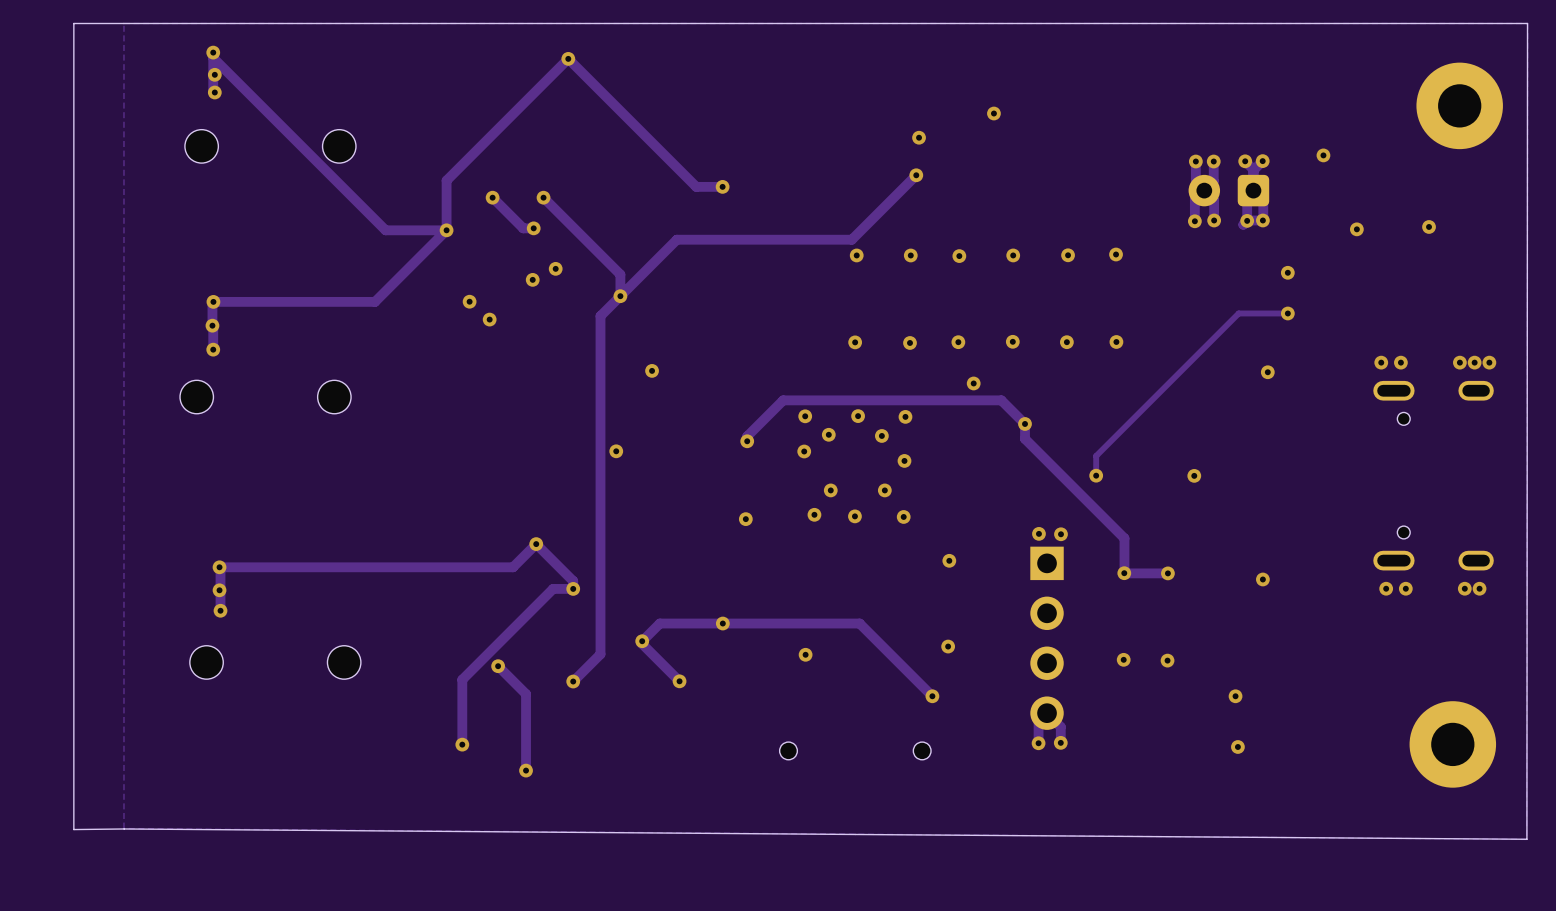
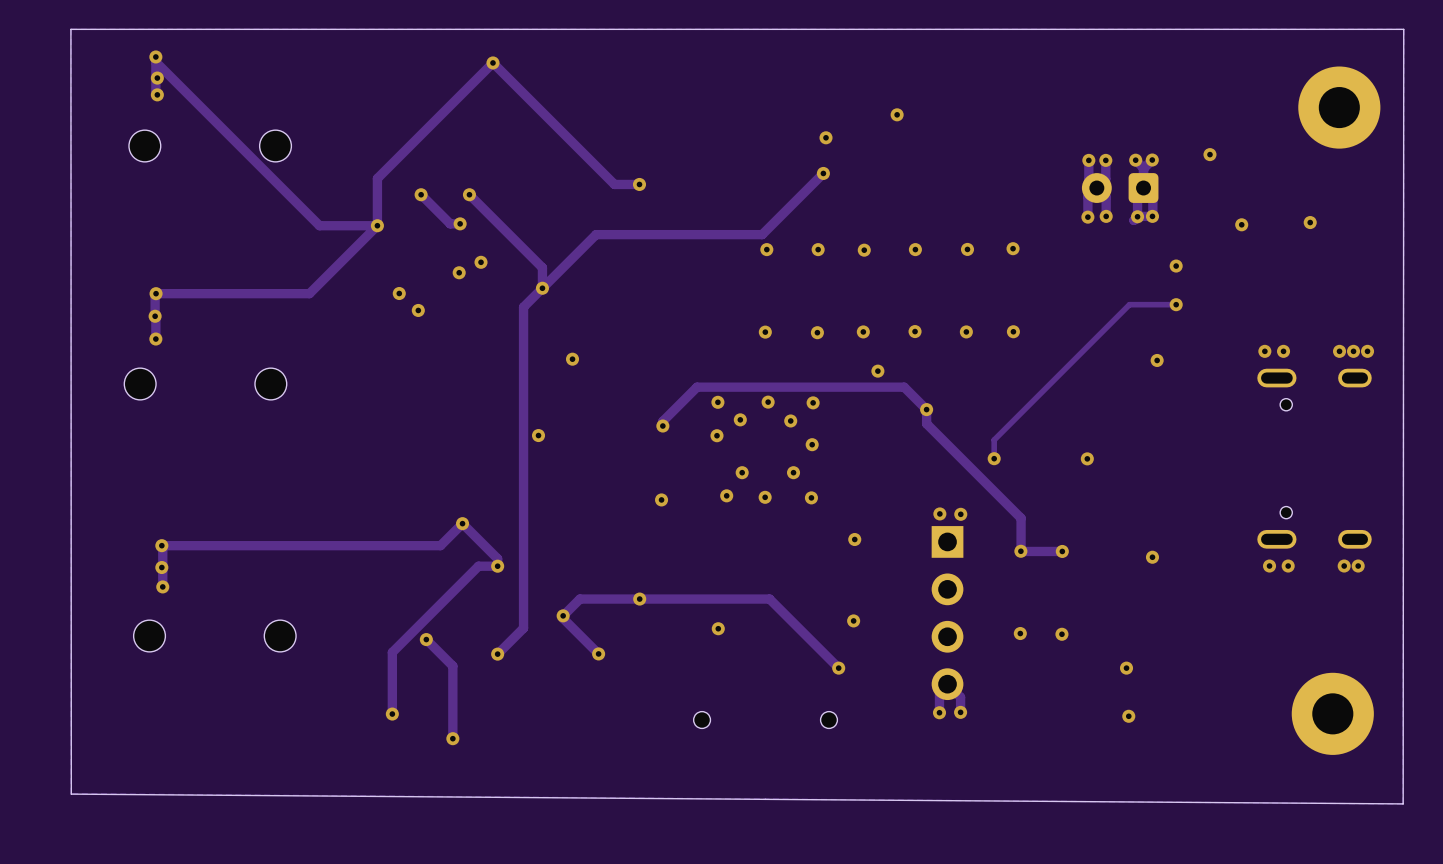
board edge: (123, 23) (73, 23) (73, 829) (124, 828) -> (70, 29) (71, 794)

